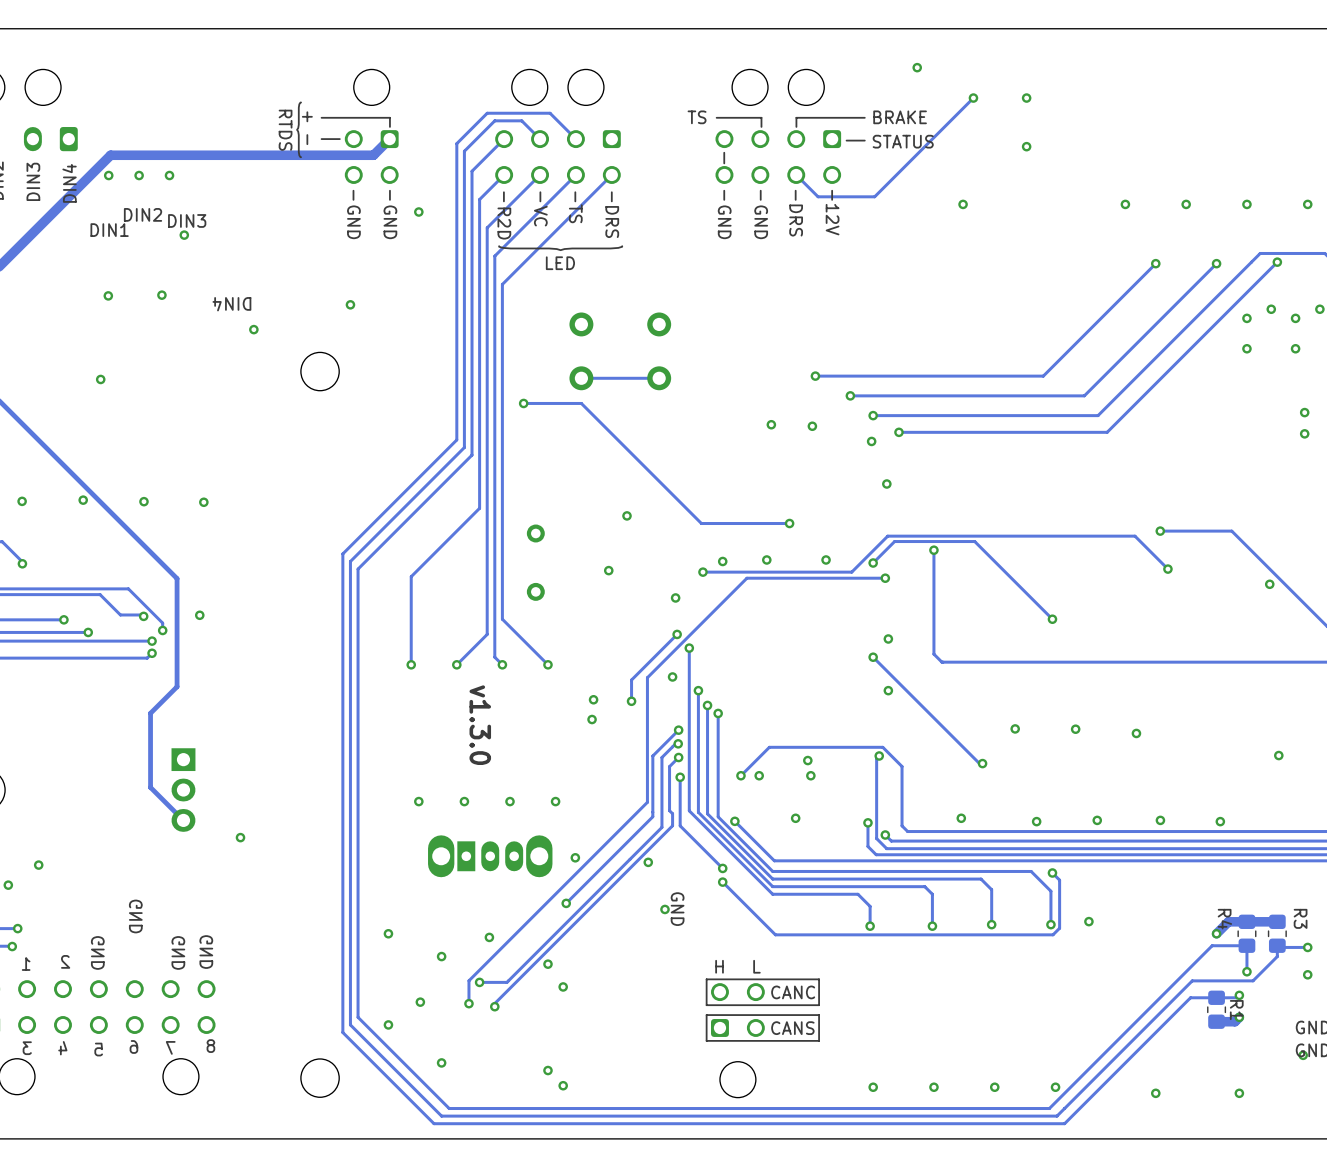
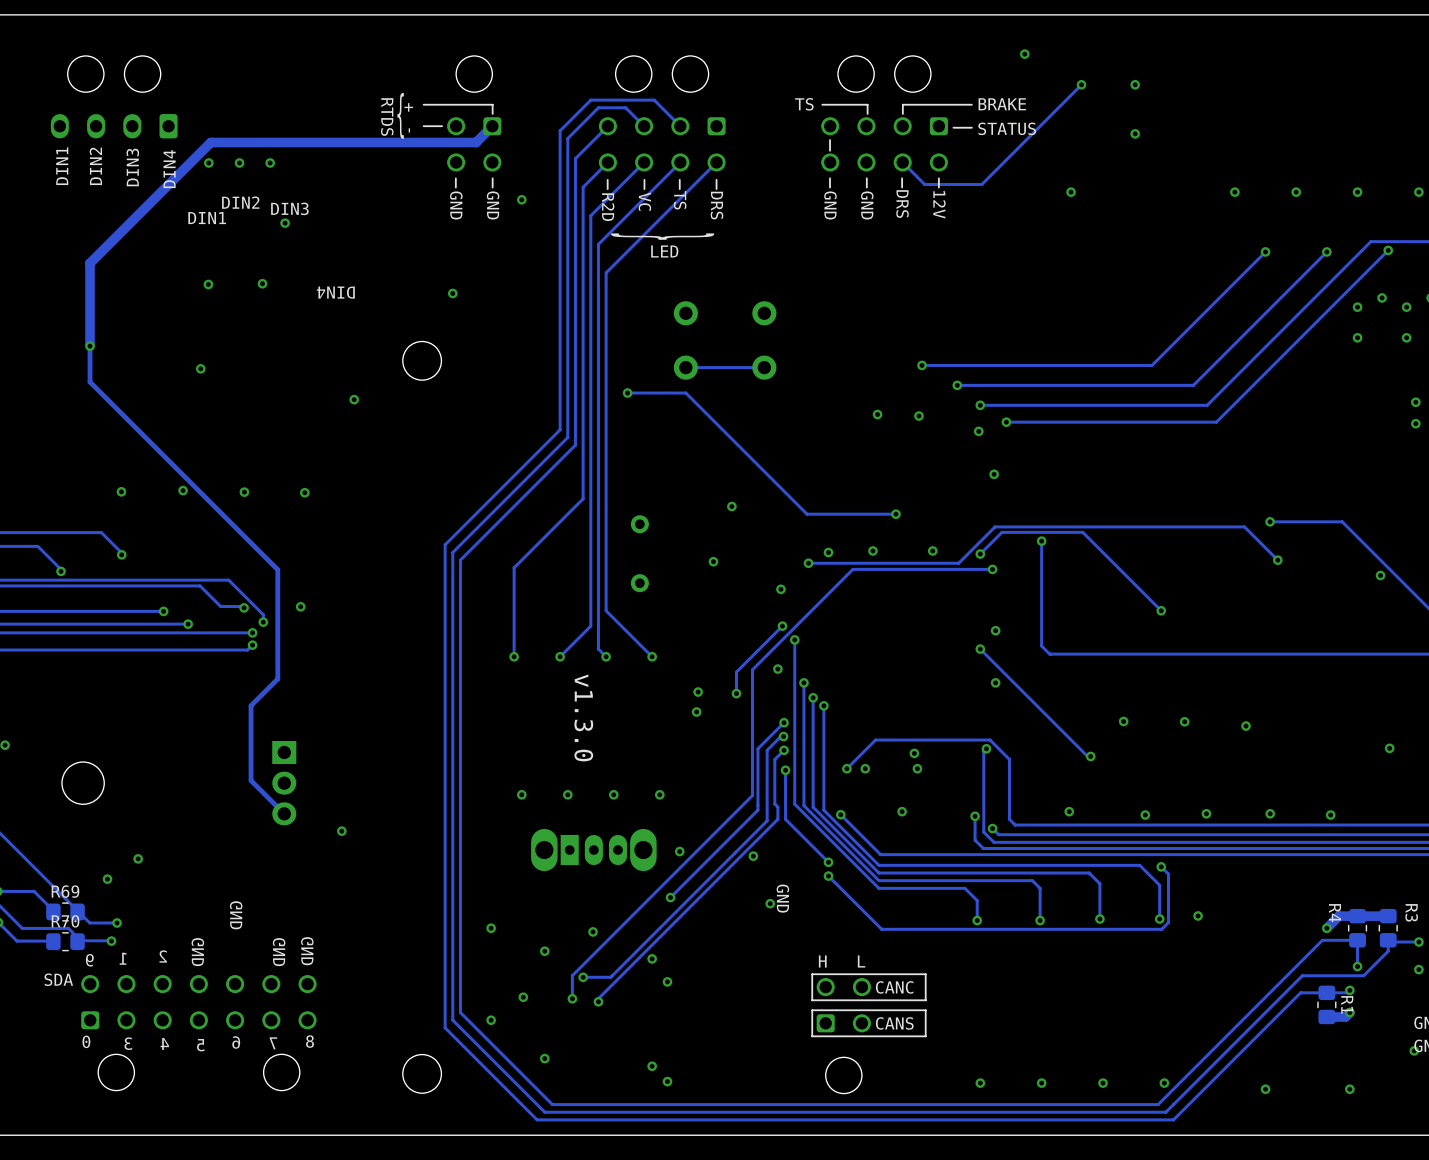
via: (253, 329) -> none
via: none -> (354, 399)

